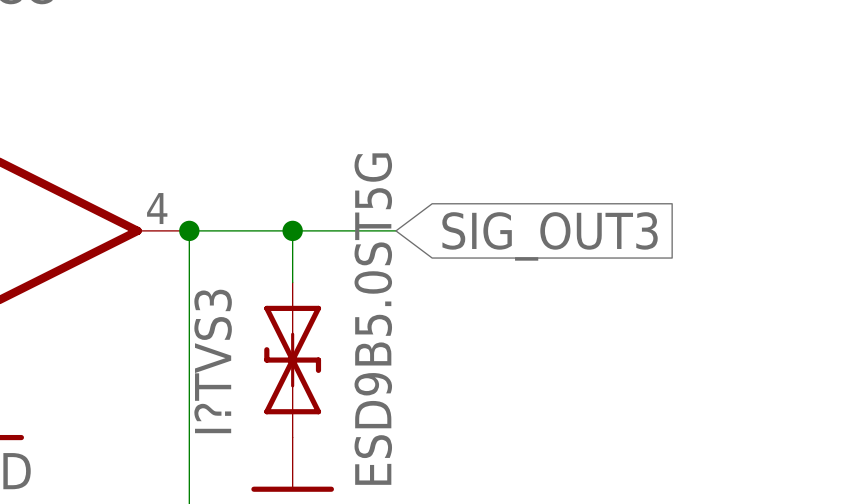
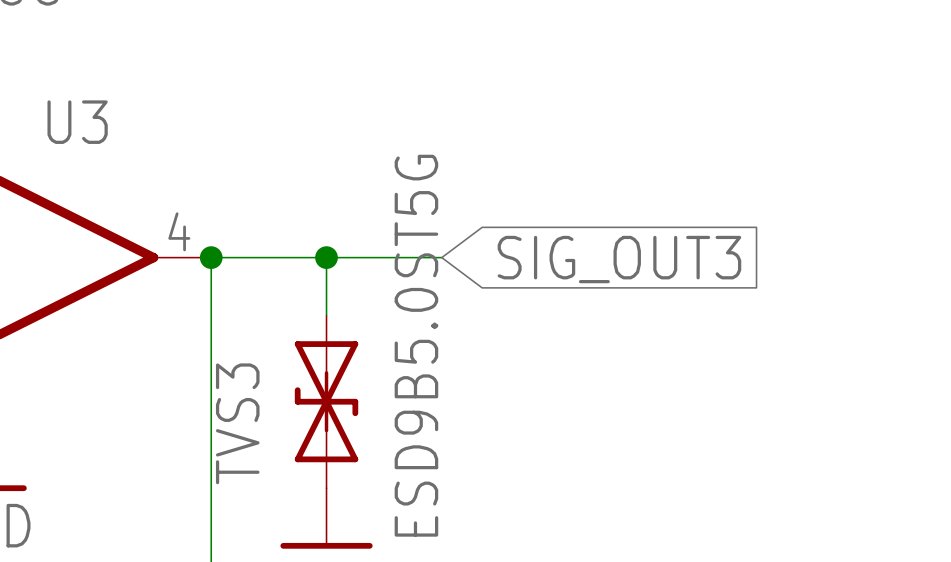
U3 name: none -> U3 (77, 122)
I?TVS3 name: I?TVS3 (213, 361) -> TVS3 (237, 423)

